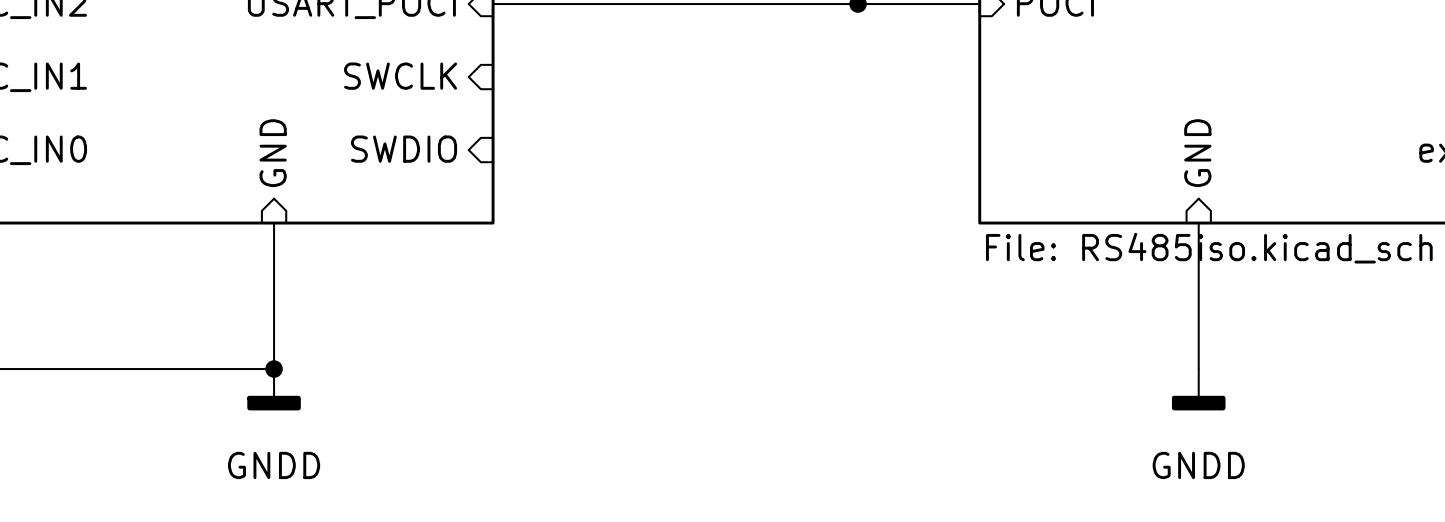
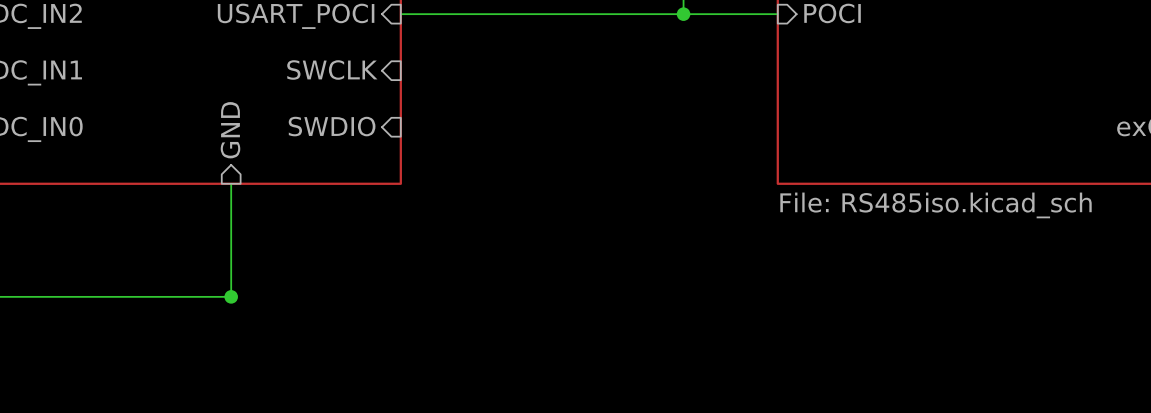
sheet pin: GND (1197, 153) -> none
wire: (1198, 223) (1198, 369) -> none
power symbol: GNDD (274, 389) -> none
power symbol: GNDD (1198, 389) -> none

